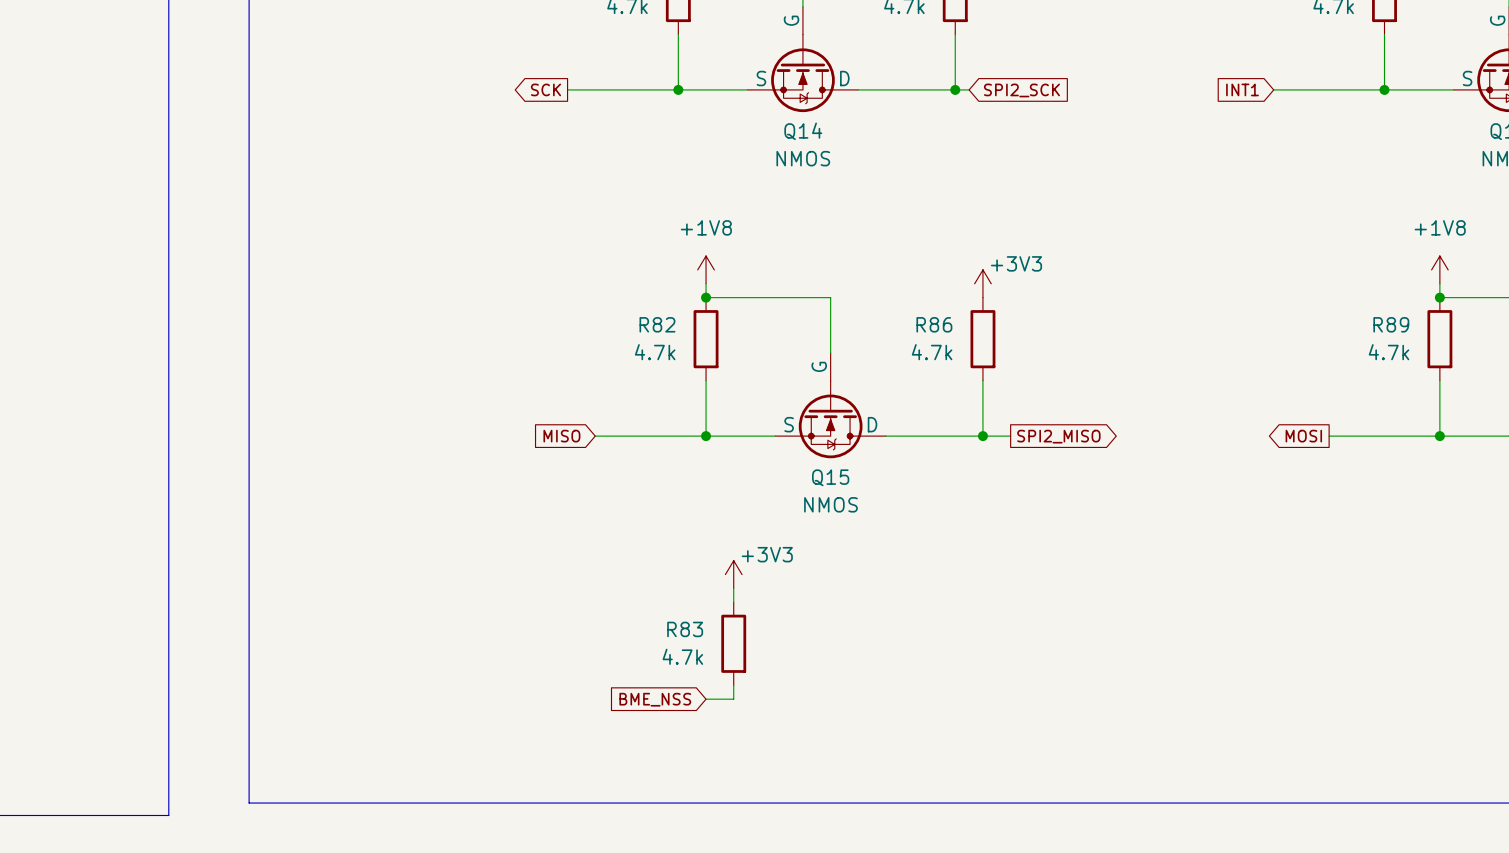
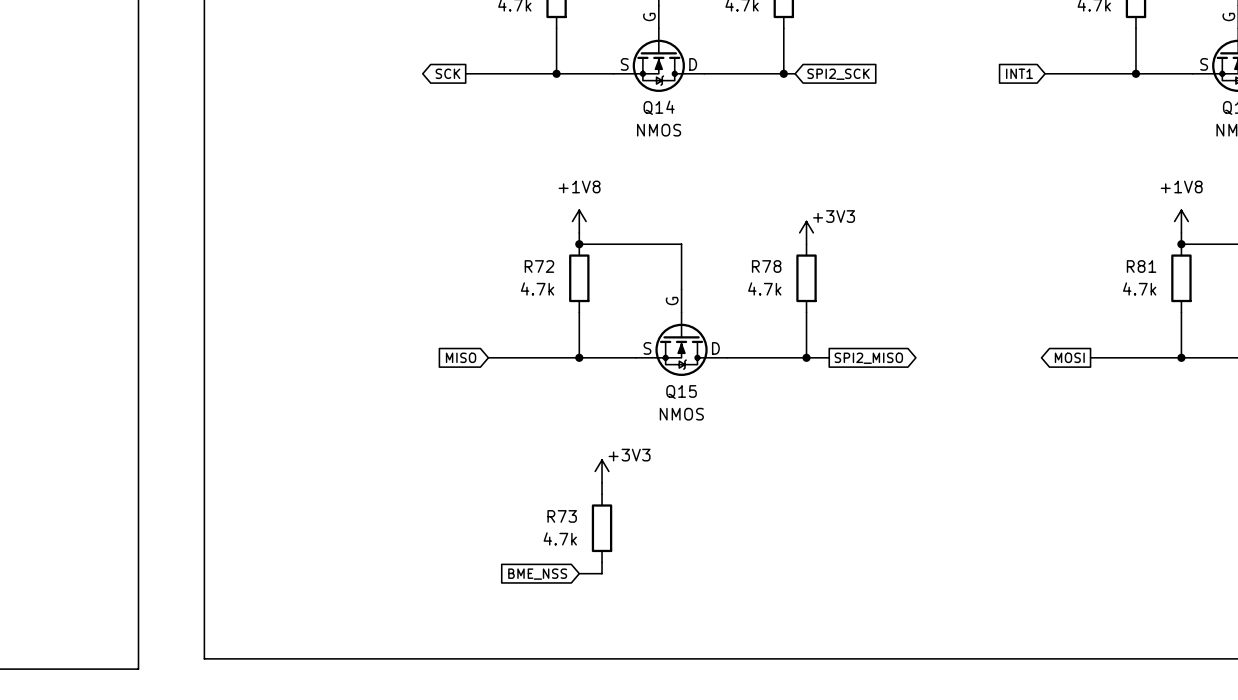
R82 name: R82 (657, 324) -> R72 (539, 266)
R86 name: R86 (934, 324) -> R78 (766, 266)
R89 name: R89 (1391, 324) -> R81 (1141, 266)
R83 name: R83 (685, 629) -> R73 (562, 516)

